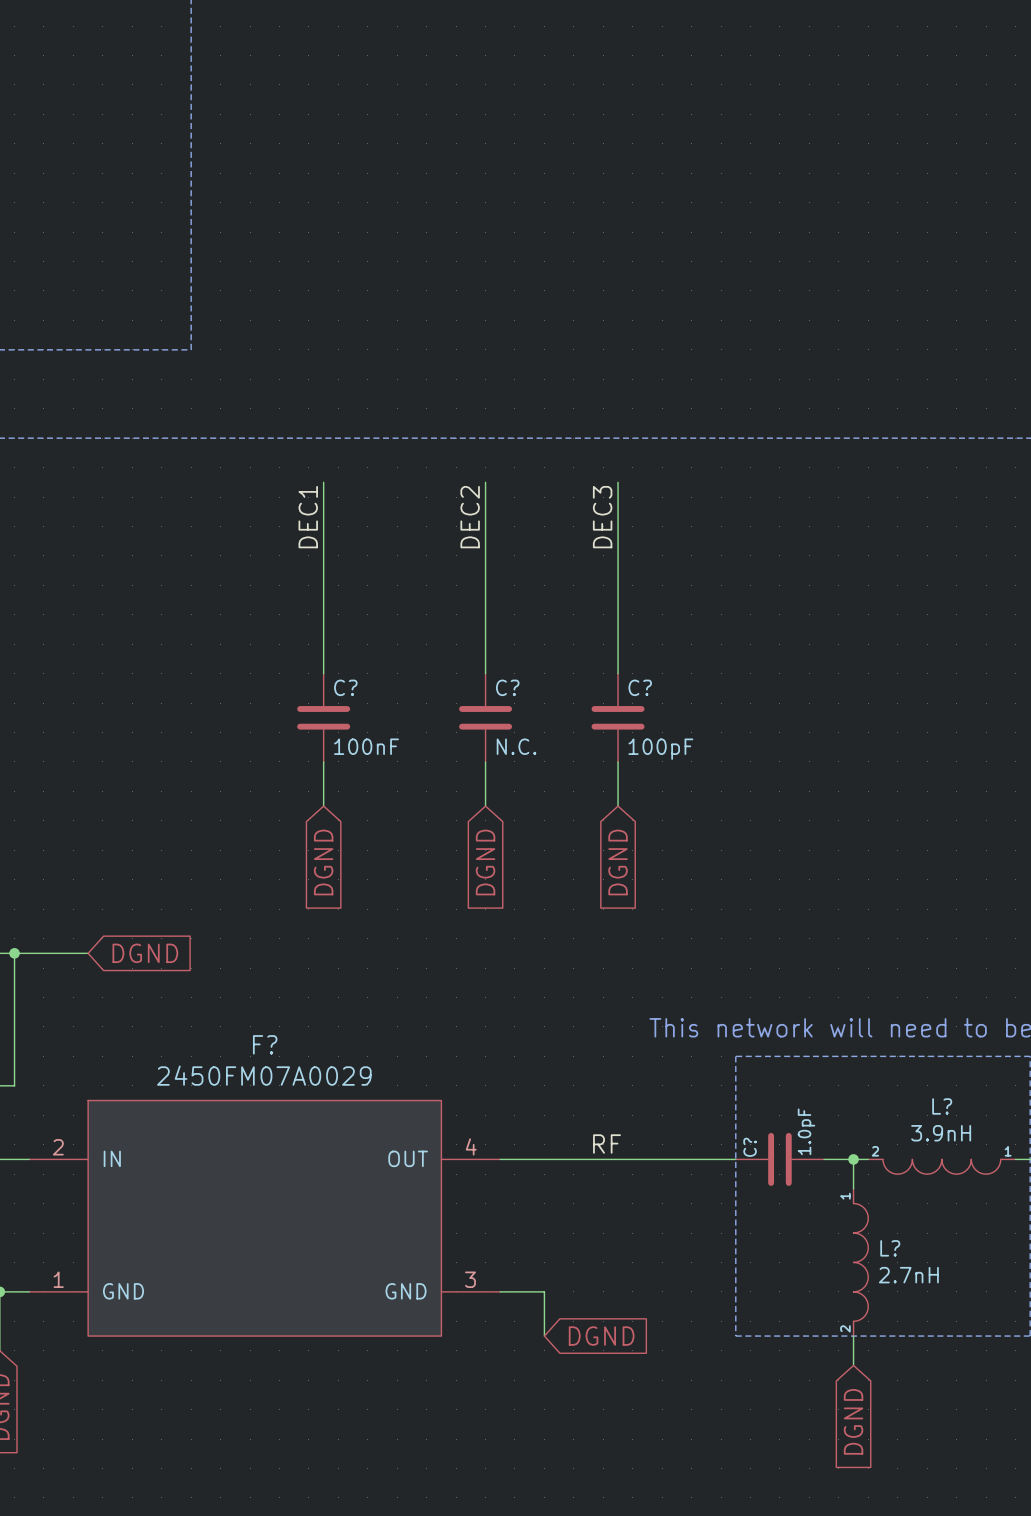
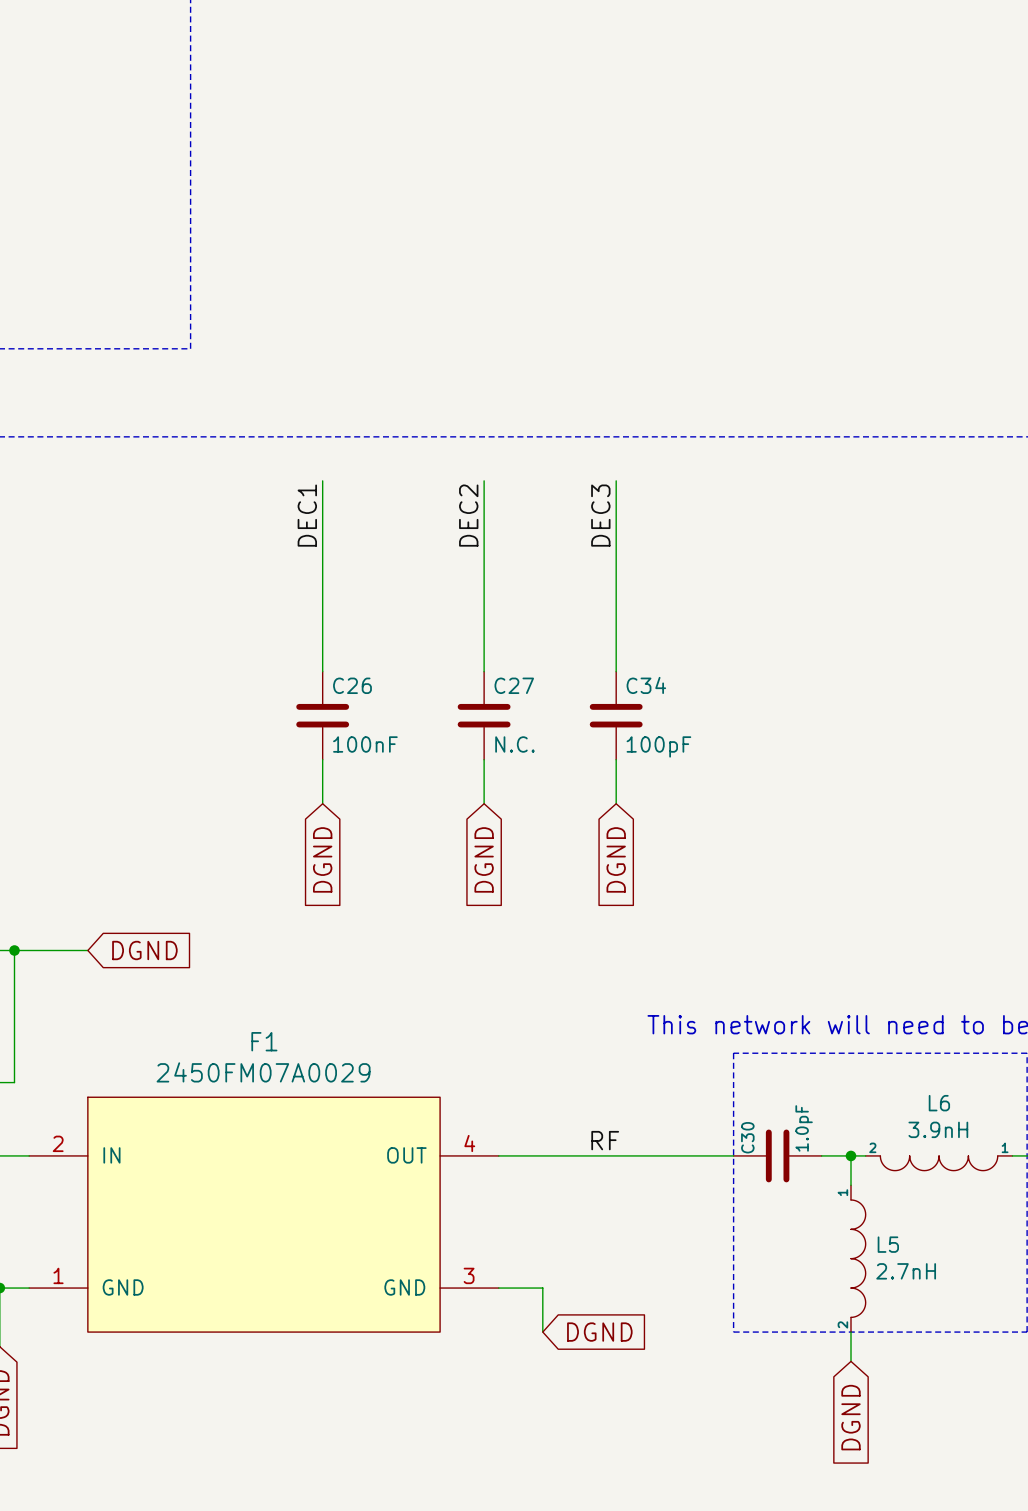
C? name: C? (345, 687) -> C26 (352, 685)
C? name: C? (507, 687) -> C27 (514, 685)
C? name: C? (640, 687) -> C34 (646, 685)
F? name: F? (265, 1044) -> F1 (264, 1041)
L? name: L? (942, 1106) -> L6 (939, 1103)
C? name: C? (750, 1147) -> C30 (747, 1137)
L? name: L? (890, 1248) -> L5 (888, 1244)

